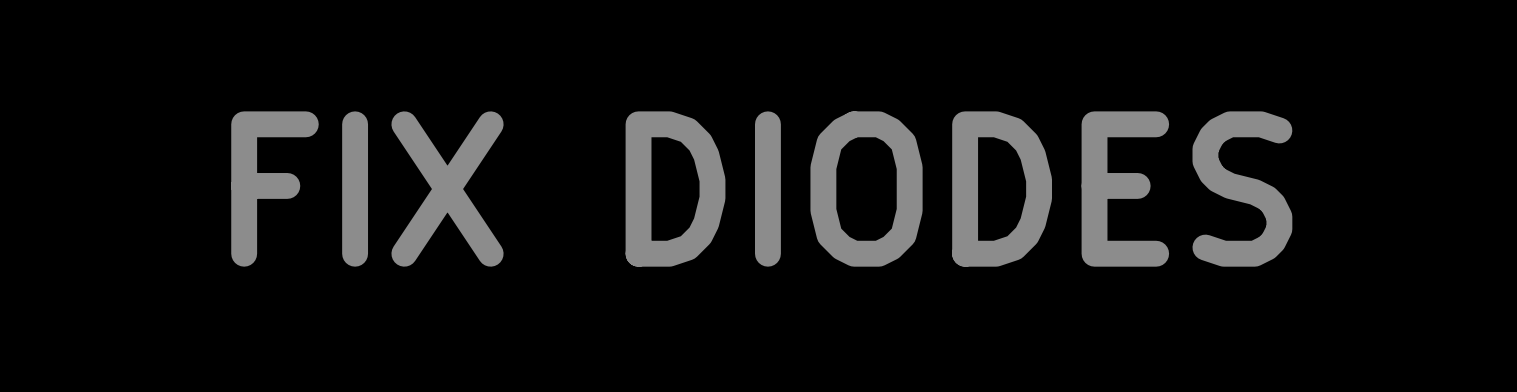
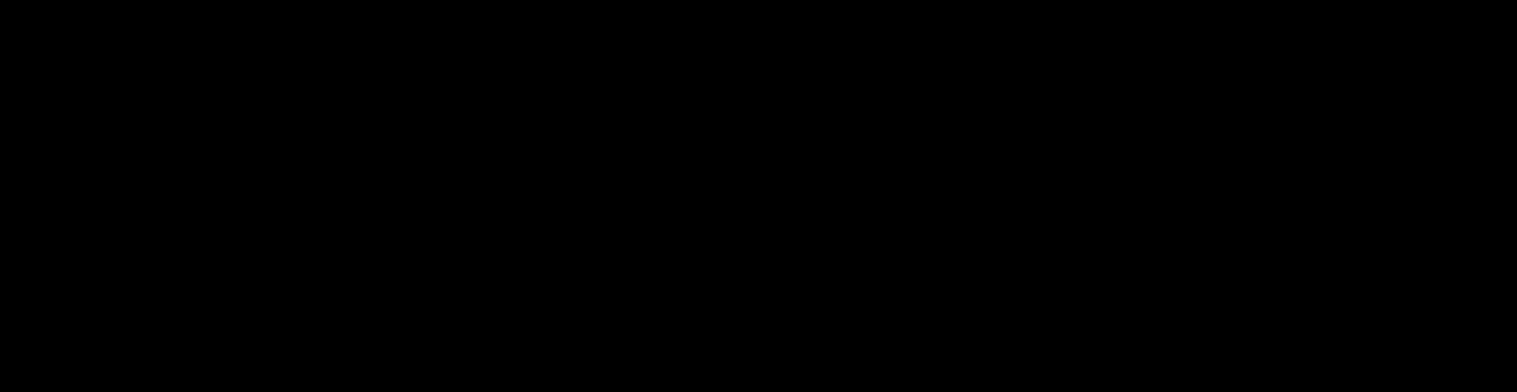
text: FIX DIODES (761, 189) -> none

